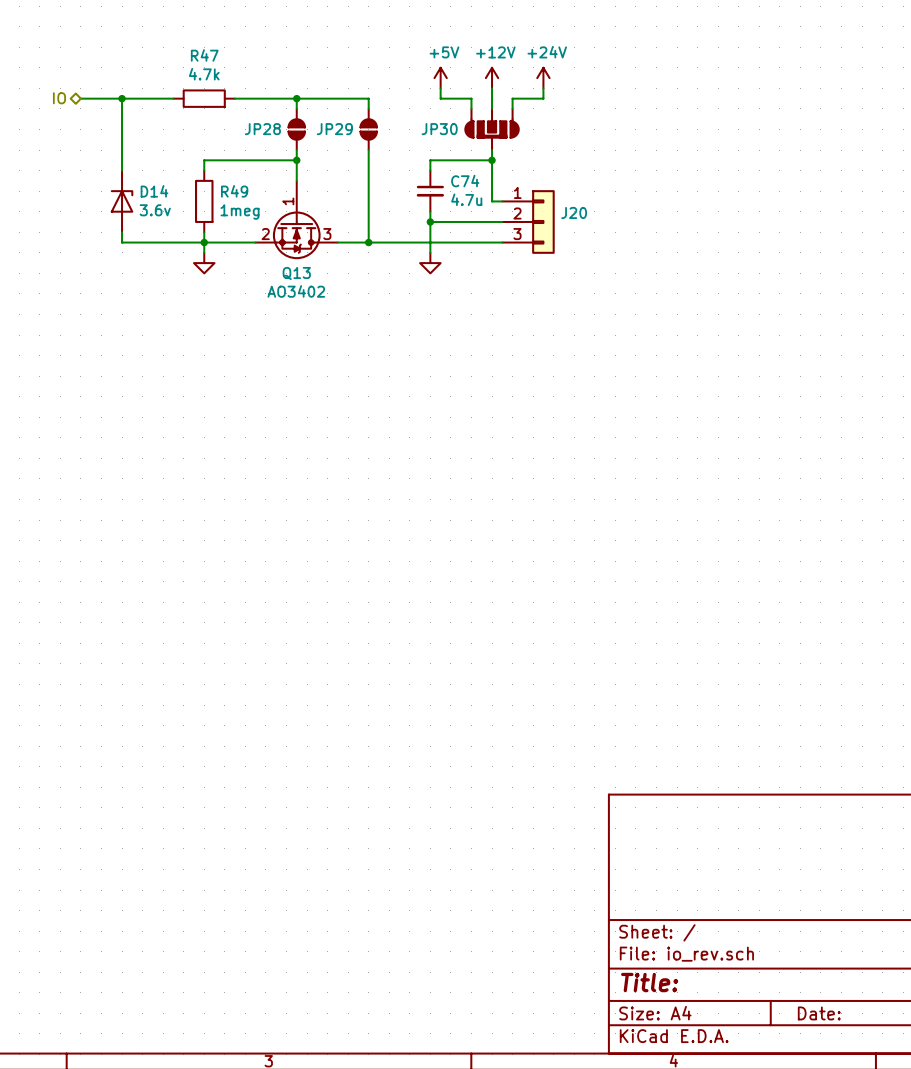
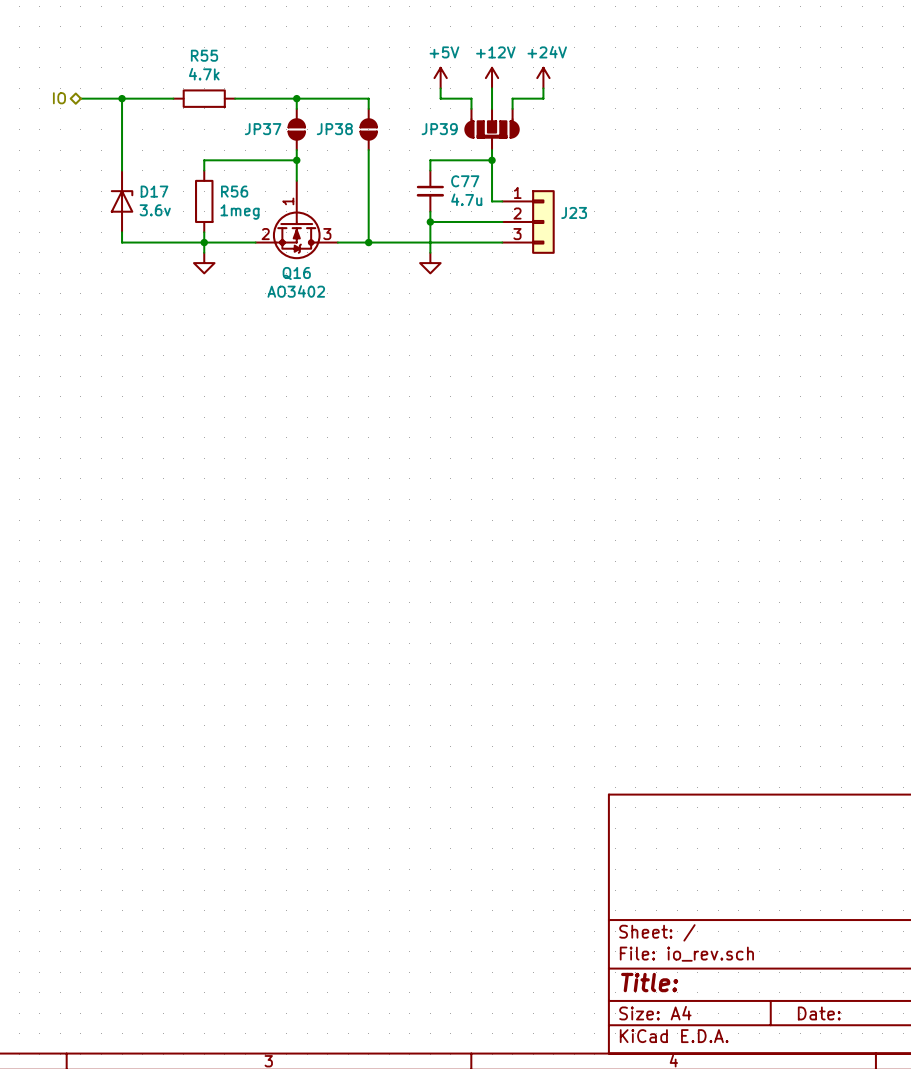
R47 name: R47 (204, 55) -> R55 (204, 55)
JP28 name: JP28 (262, 129) -> JP37 (263, 129)
JP29 name: JP29 (334, 129) -> JP38 (334, 129)
JP30 name: JP30 (439, 129) -> JP39 (439, 129)
C74 name: C74 (465, 181) -> C77 (465, 181)
D14 name: D14 (154, 191) -> D17 (154, 191)
R49 name: R49 (234, 191) -> R56 (234, 191)
J20 name: J20 (574, 212) -> J23 (574, 212)
Q13 name: Q13 (296, 273) -> Q16 (296, 273)

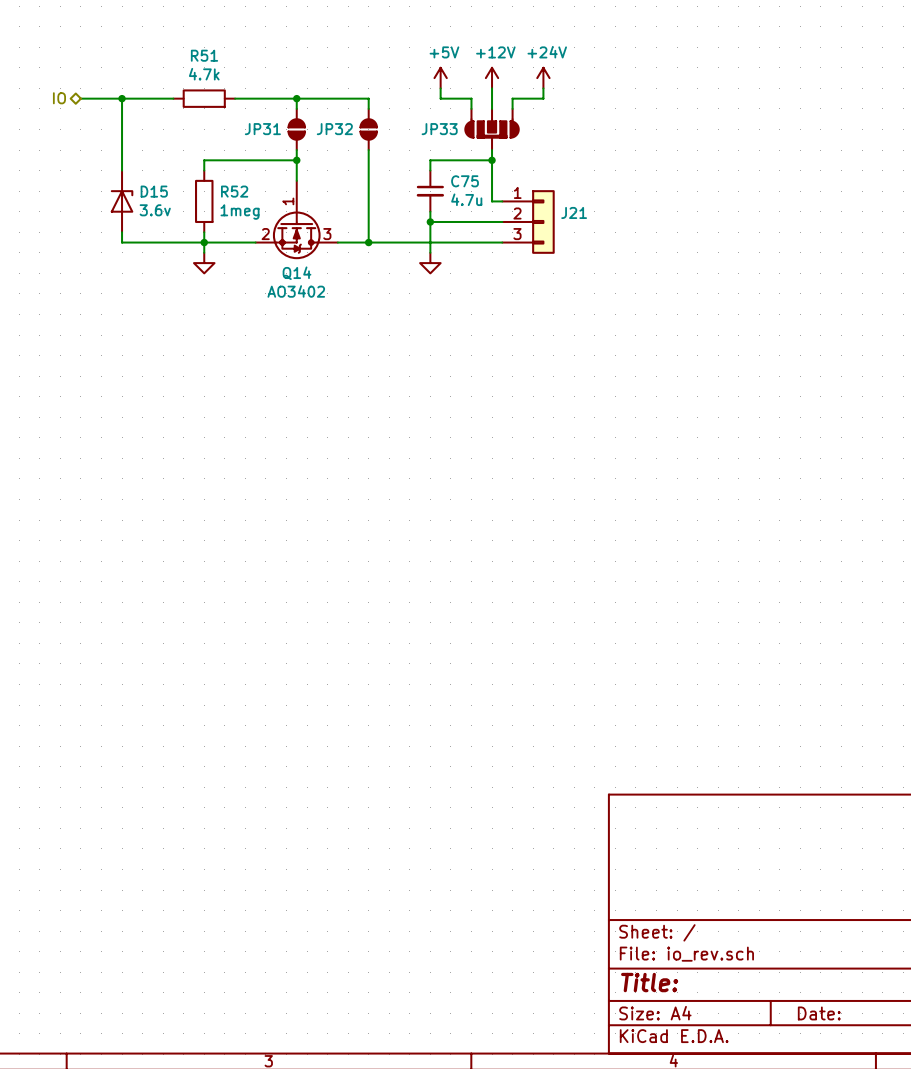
R55 name: R55 (204, 55) -> R51 (204, 55)
JP37 name: JP37 (263, 129) -> JP31 (262, 129)
JP38 name: JP38 (334, 129) -> JP32 (334, 129)
JP39 name: JP39 (439, 129) -> JP33 (439, 129)
C77 name: C77 (465, 181) -> C75 (465, 181)
D17 name: D17 (154, 191) -> D15 (154, 191)
R56 name: R56 (234, 191) -> R52 (234, 191)
J23 name: J23 (574, 212) -> J21 (574, 212)
Q16 name: Q16 (296, 273) -> Q14 (297, 273)

